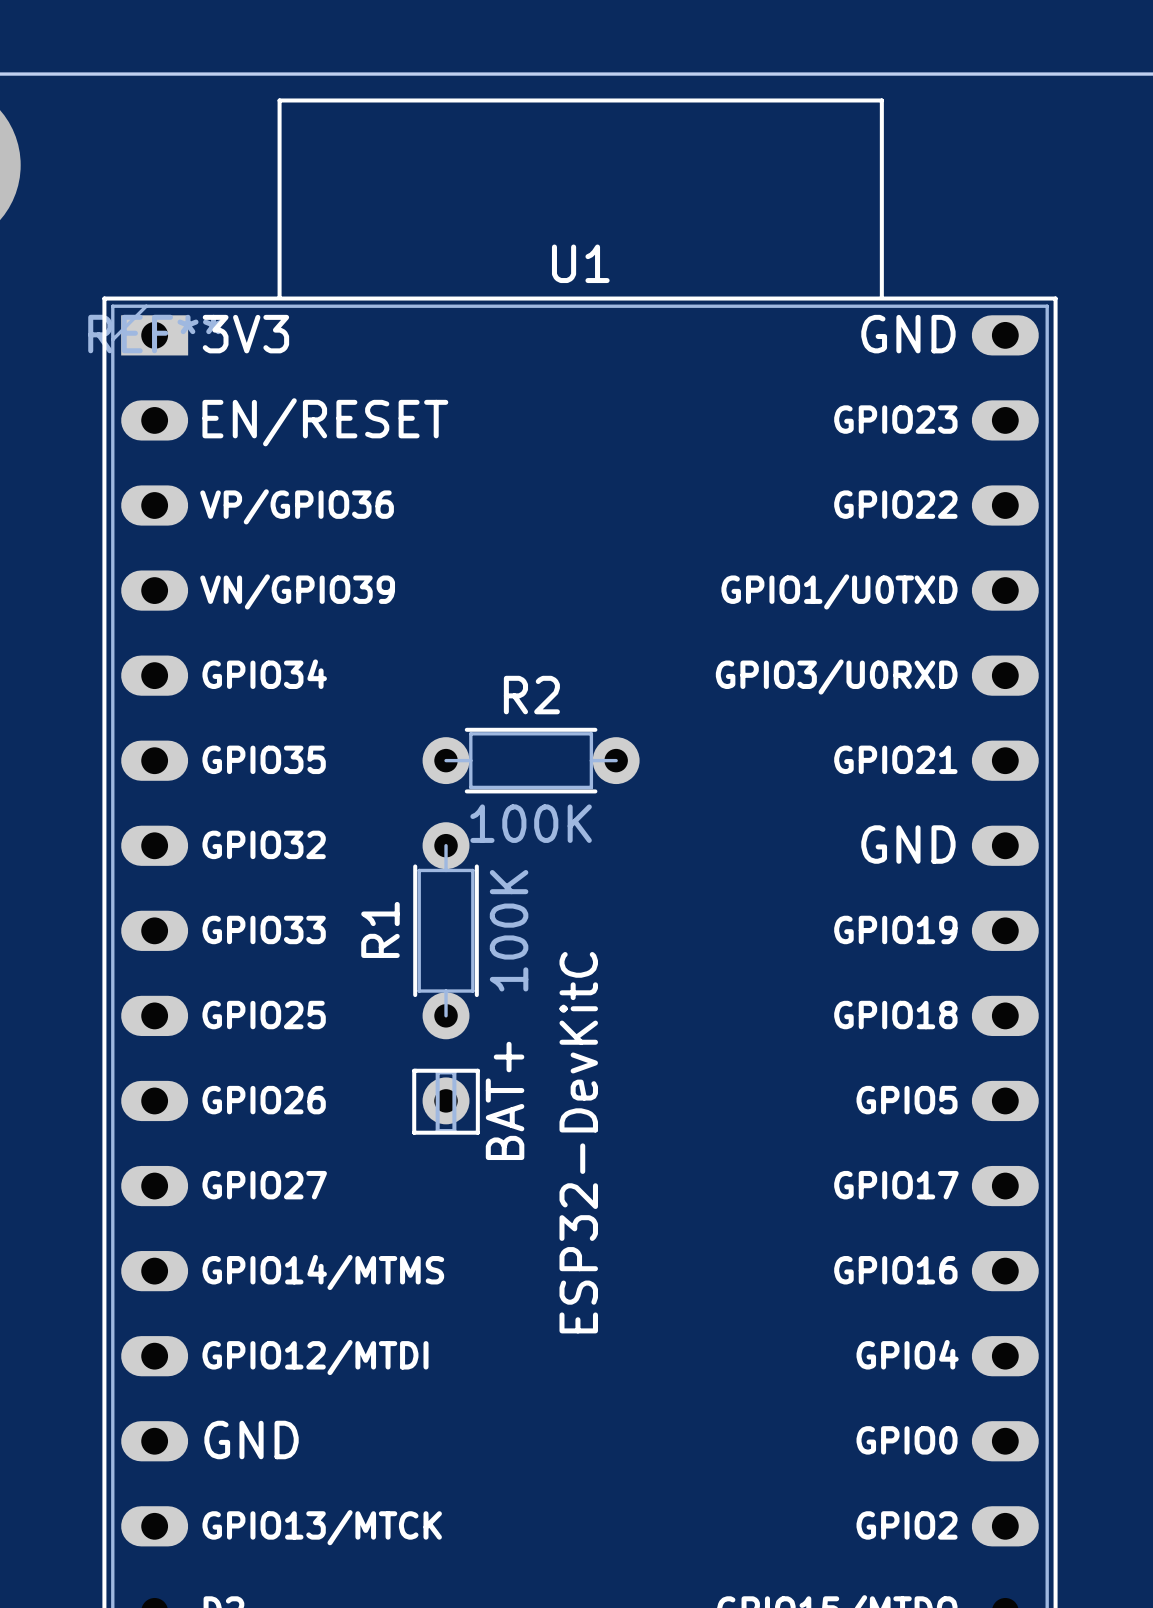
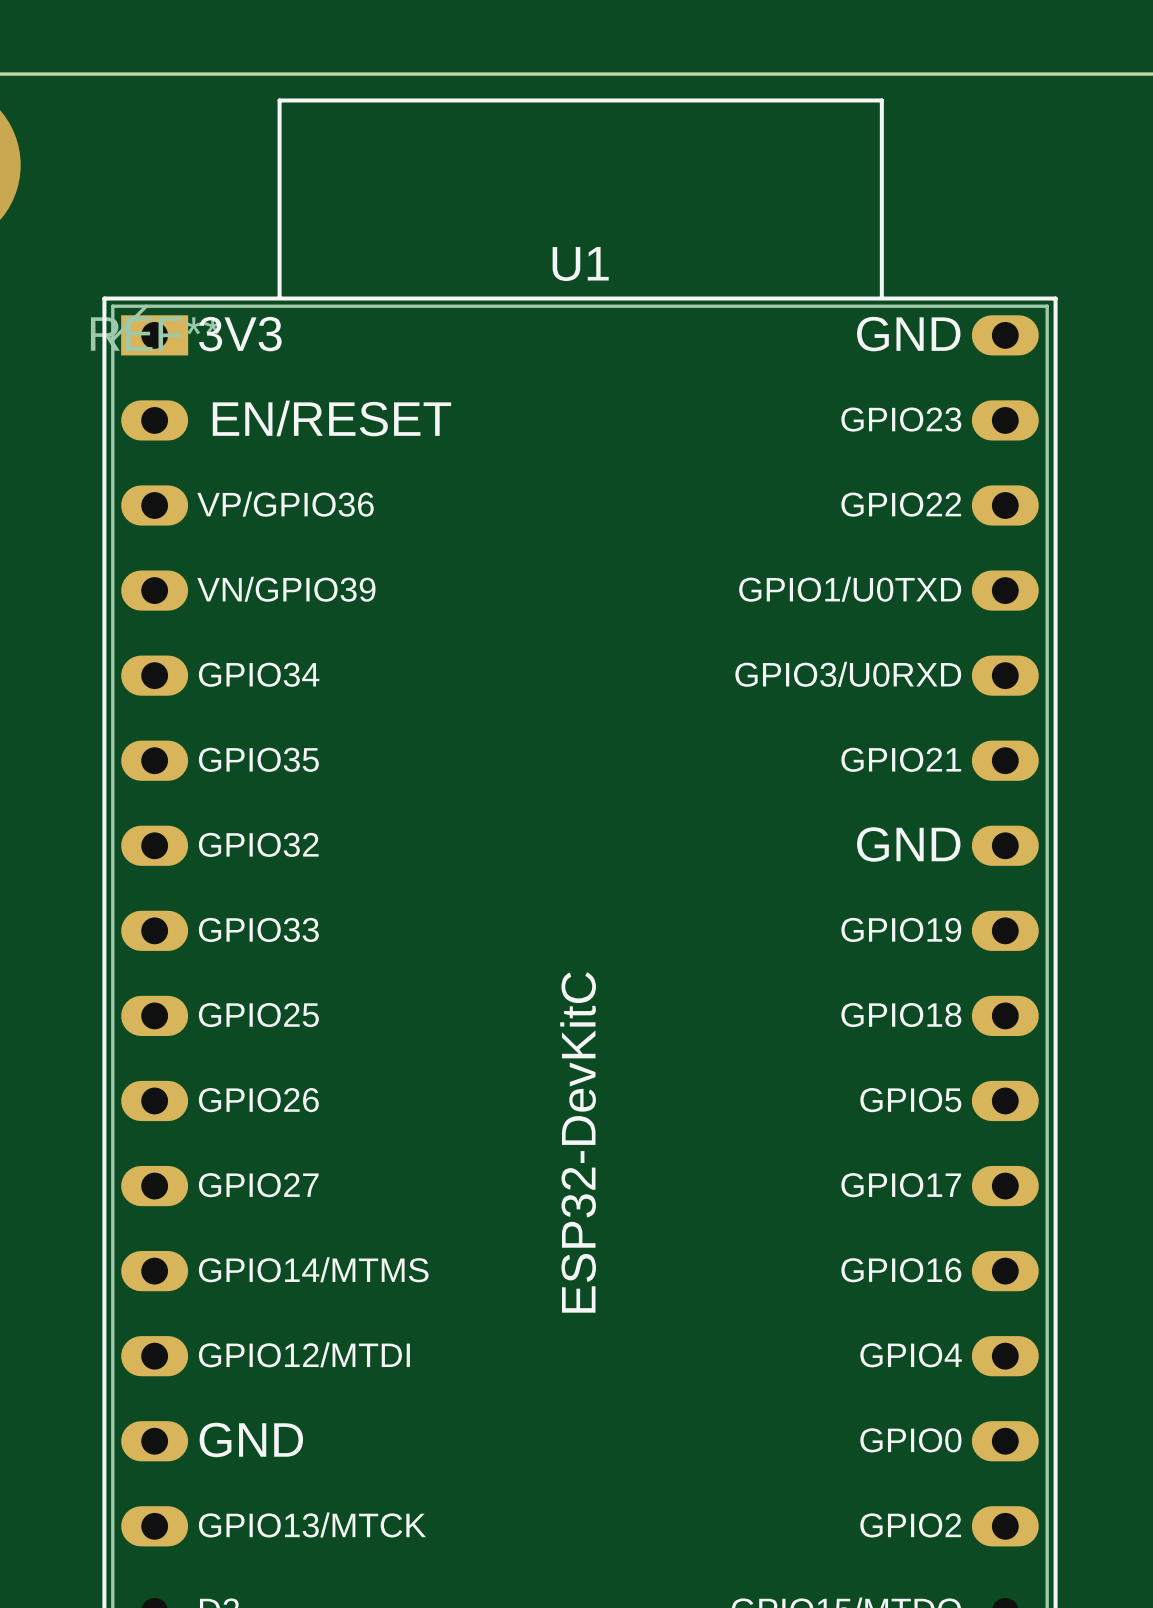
R2: 100K (531, 760) -> none
R1: 100K (446, 930) -> none
BAT+: (446, 1101) -> none

